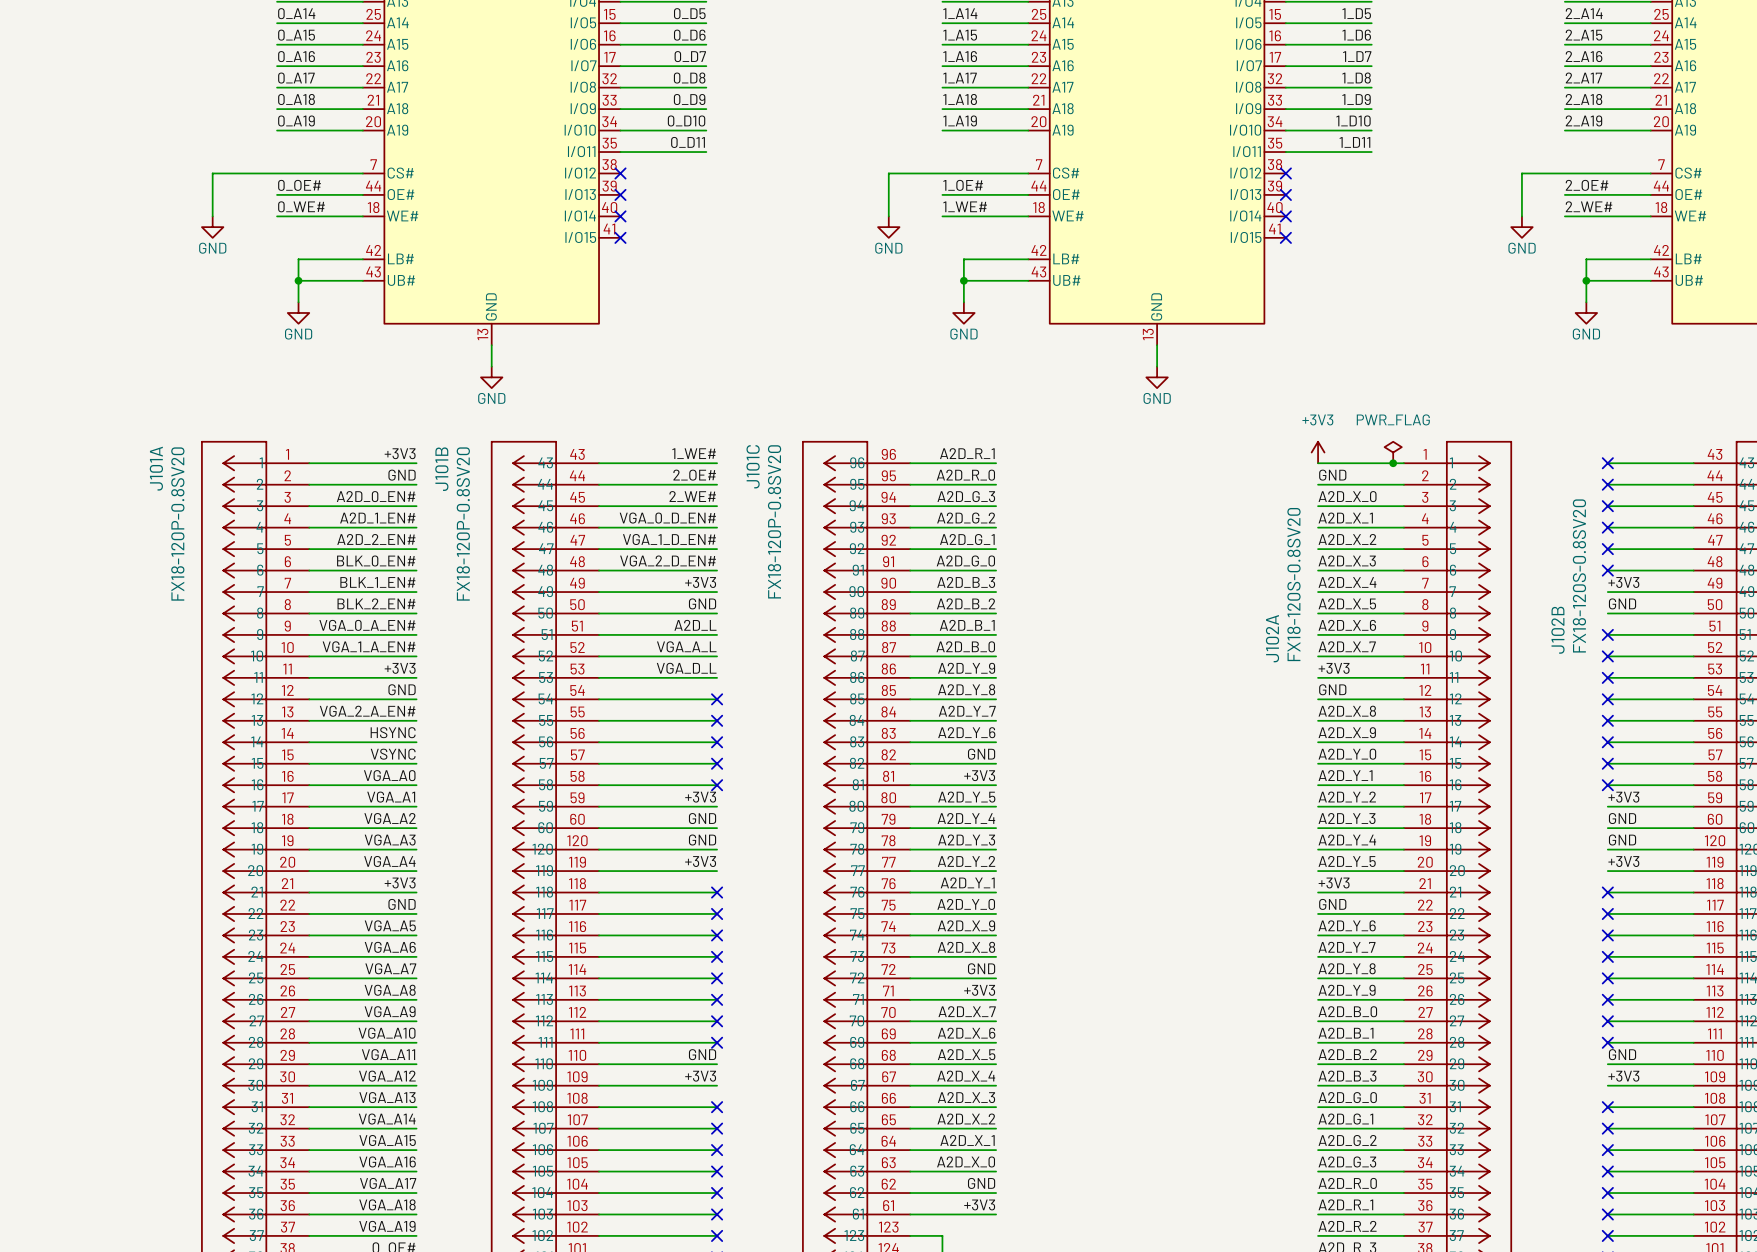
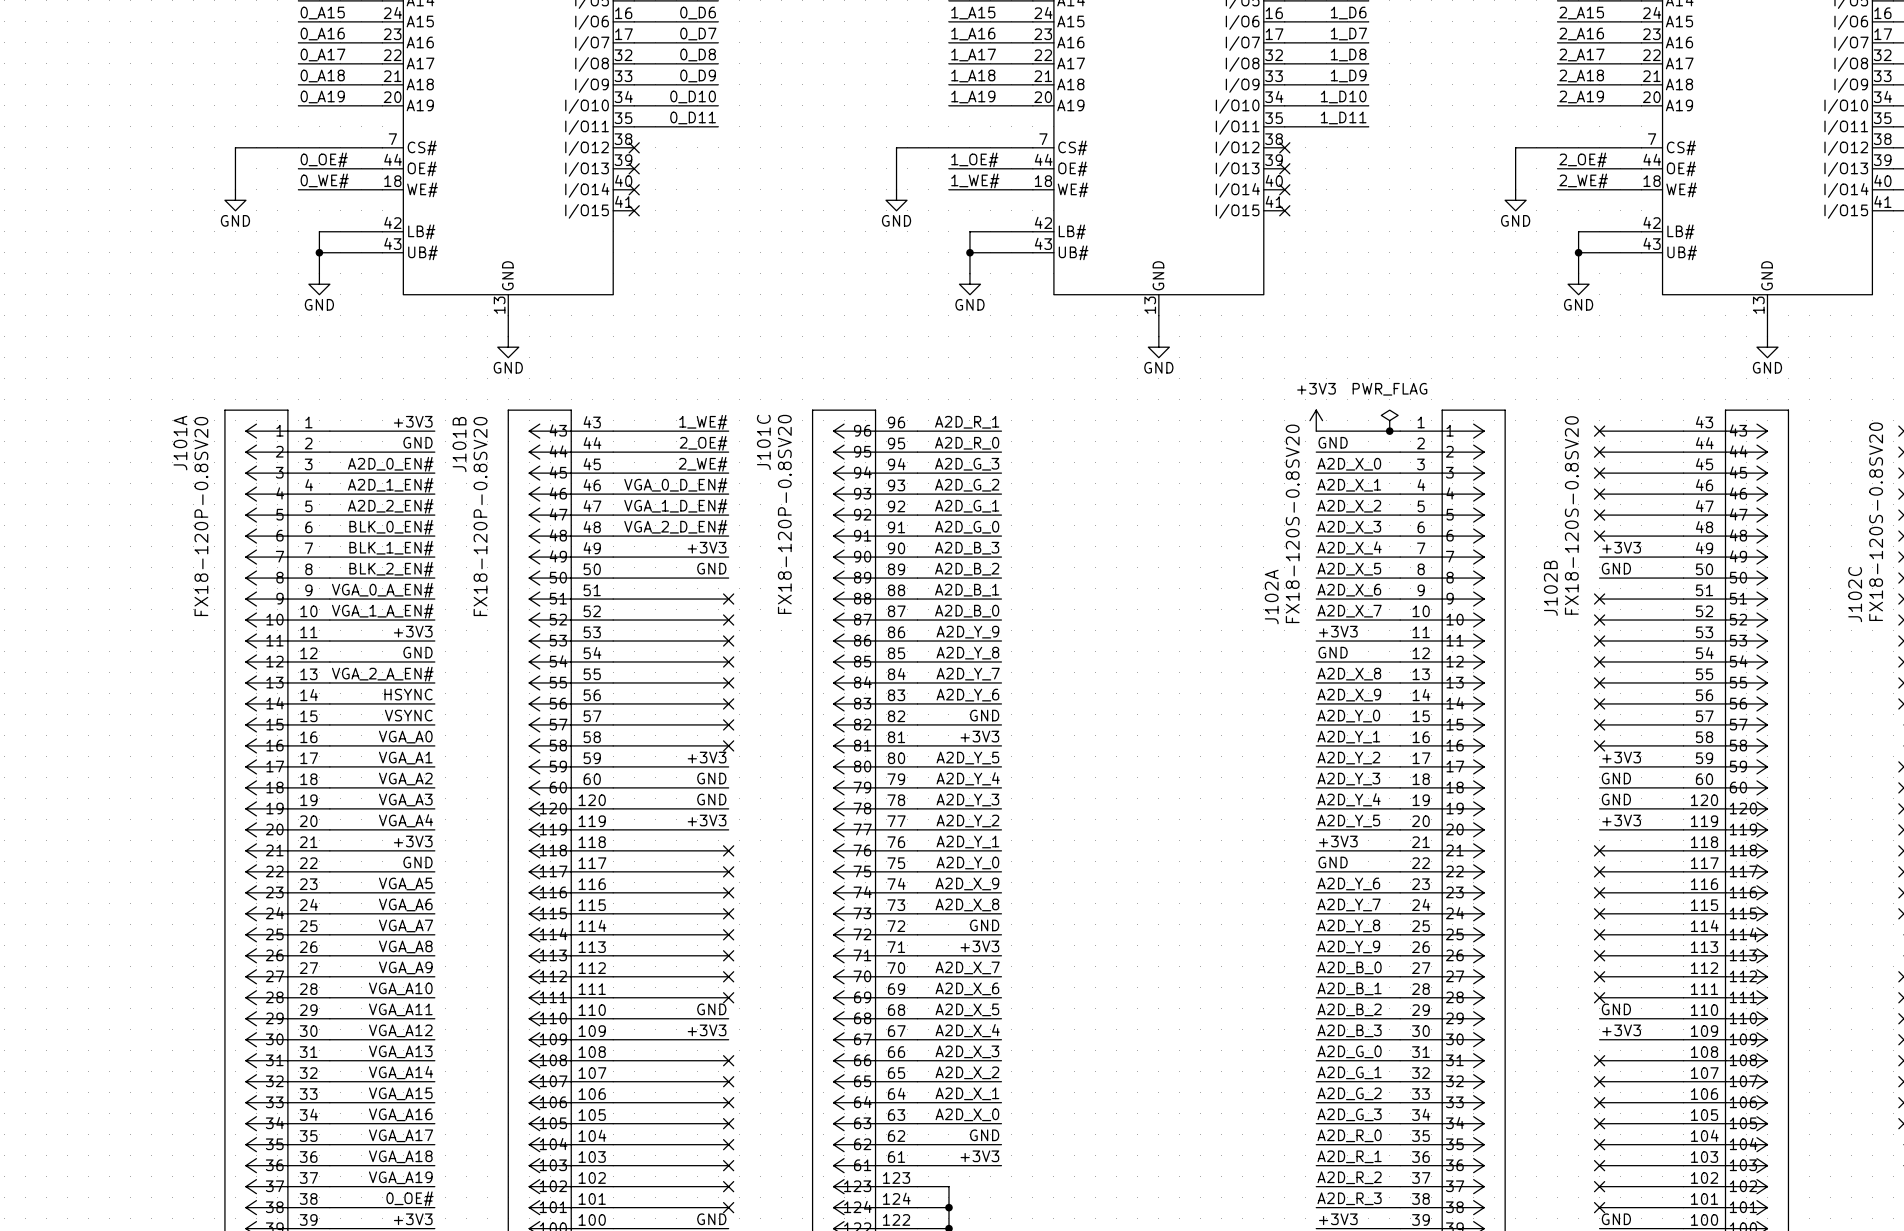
label: A2D_L (695, 625) -> none
no-connect mark: none -> (728, 599)
label: VGA_A_L (686, 646) -> none
no-connect mark: none -> (728, 620)
label: VGA_D_L (686, 668) -> none
no-connect mark: none -> (728, 641)

